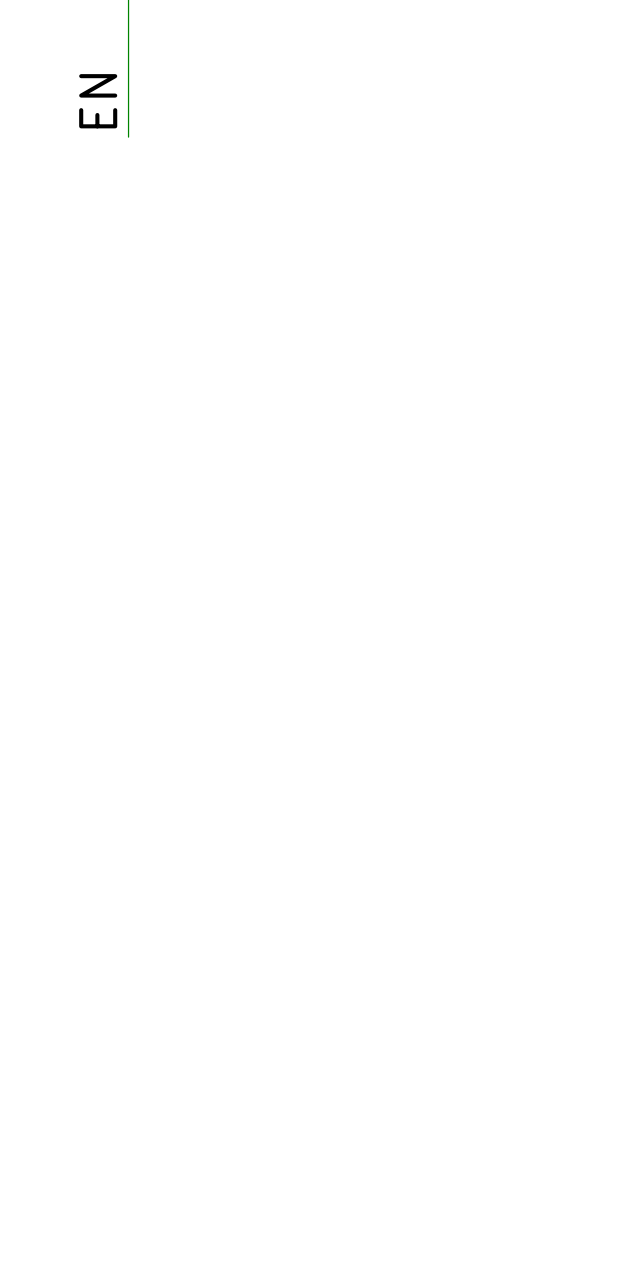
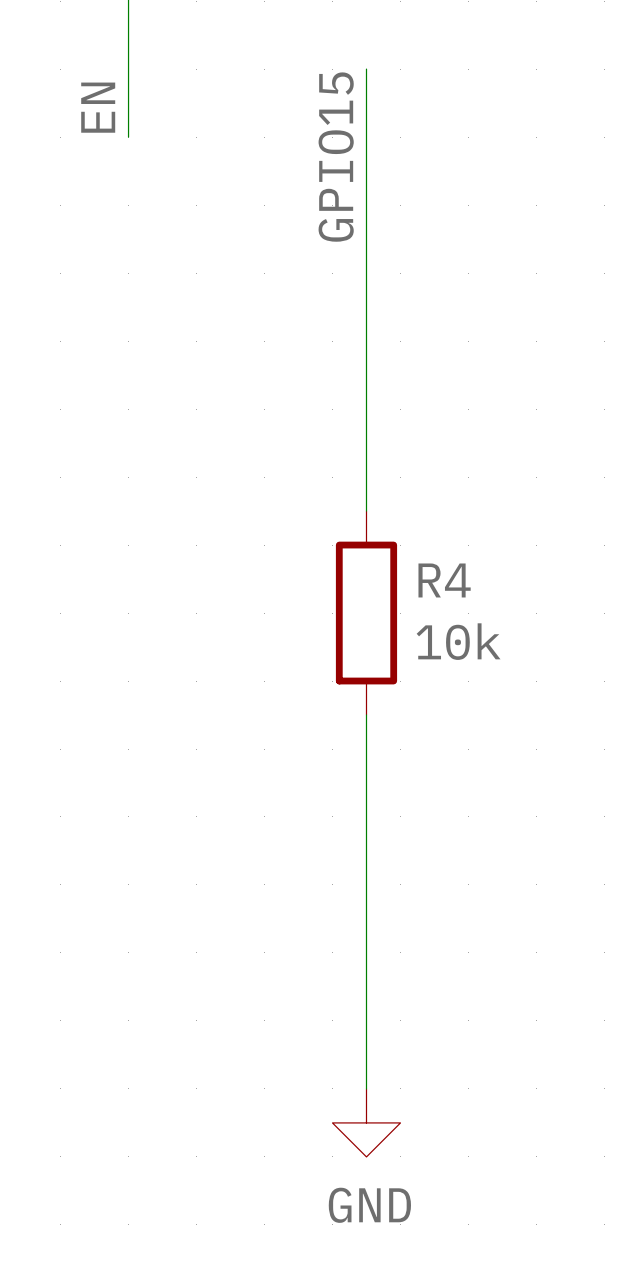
wire: none -> (366, 69) (366, 511)
label: none -> GPIO15 (336, 157)
R4: none -> 10k (366, 613)
wire: none -> (366, 715) (366, 1088)
power symbol: none -> GND (366, 1122)

